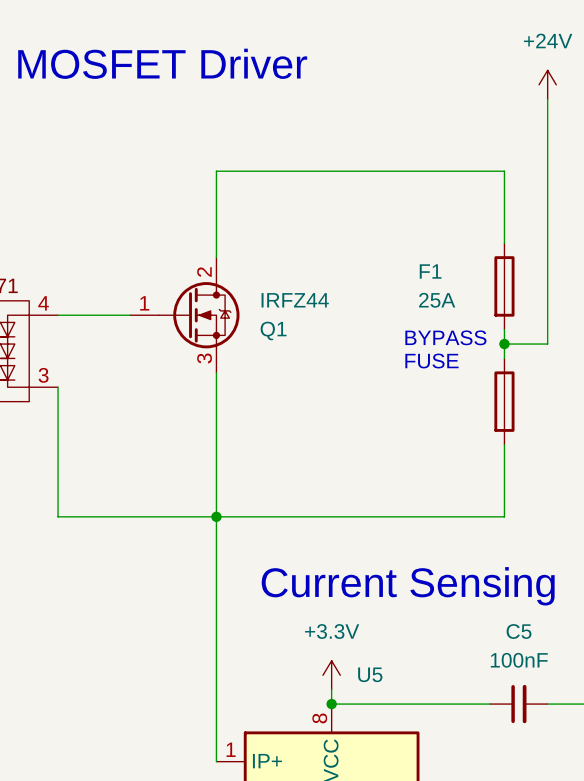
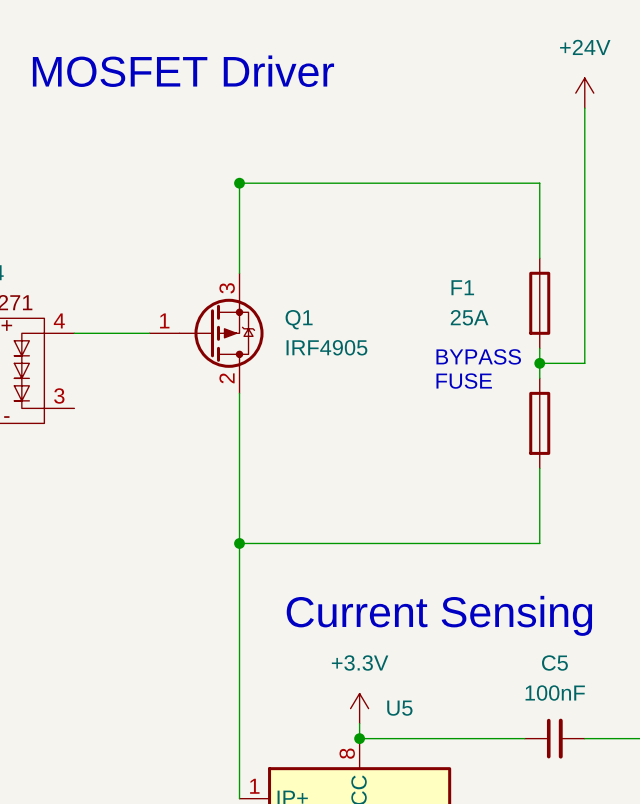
junction: none -> (239, 183)
Q1 symbol: [130, 257, 240, 373] -> [149, 273, 264, 394]
Q1 value: IRFZ44 (295, 300) -> IRF4905 (326, 347)
Q1 name position: Q1 (273, 330) -> Q1 (299, 319)
wire: (58, 387) (58, 516) (216, 516) -> none

